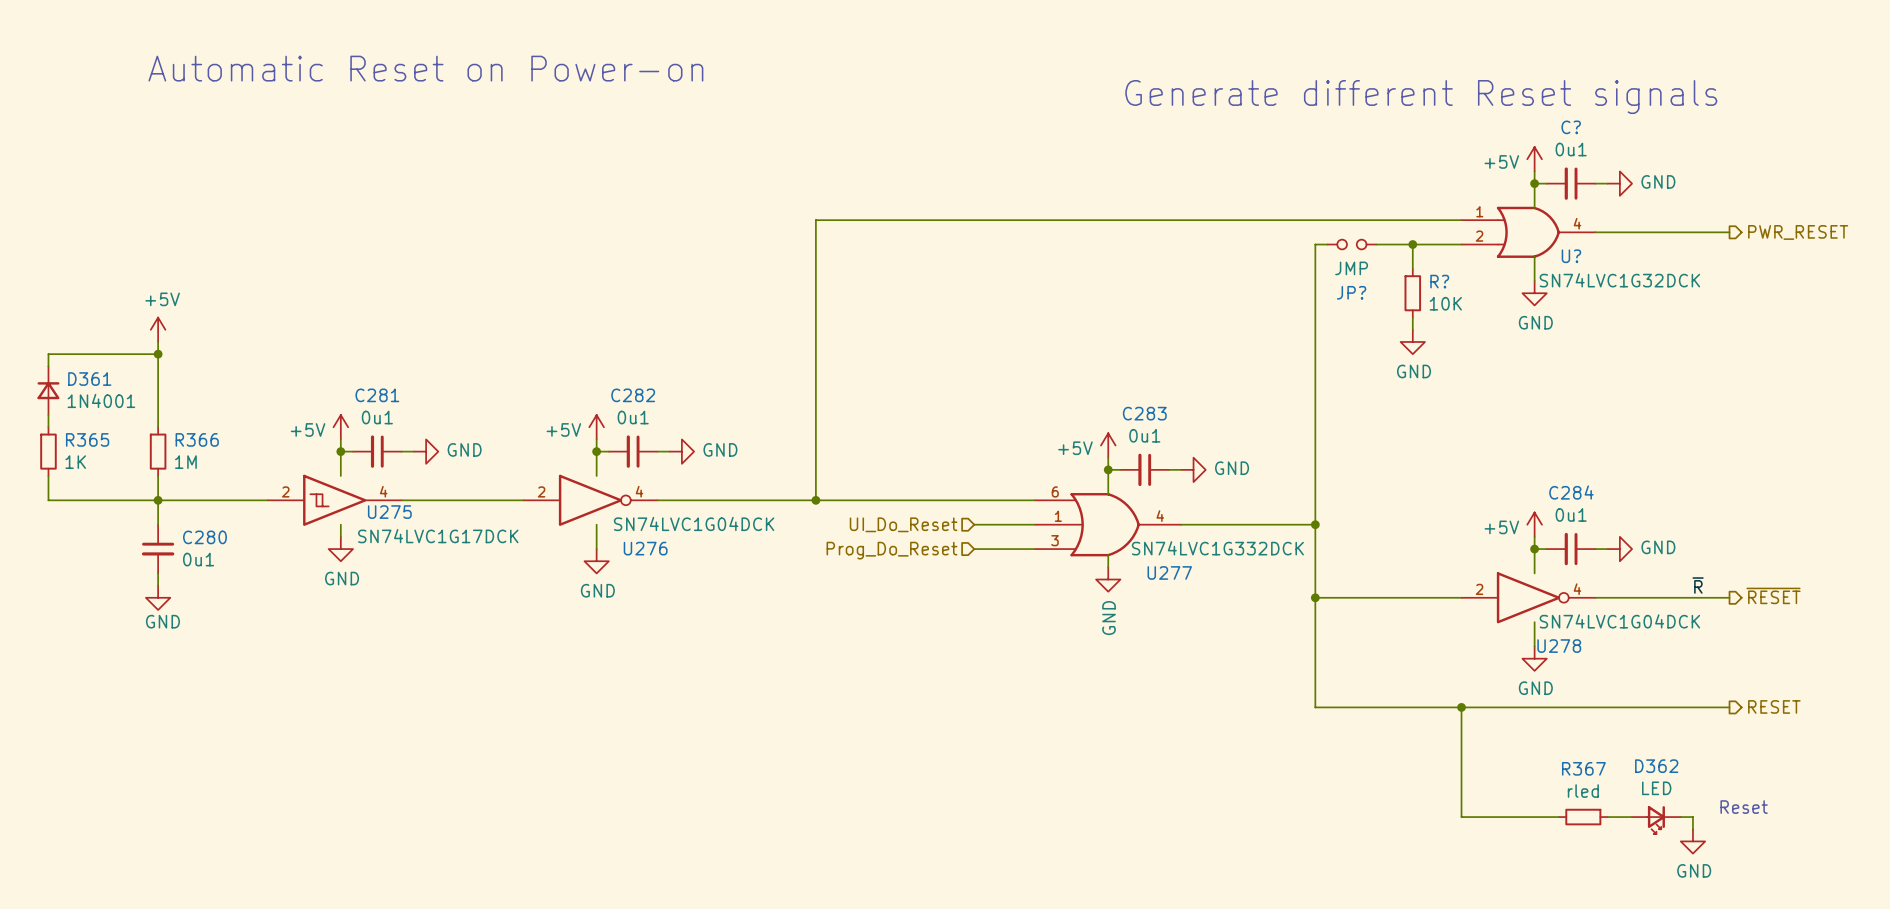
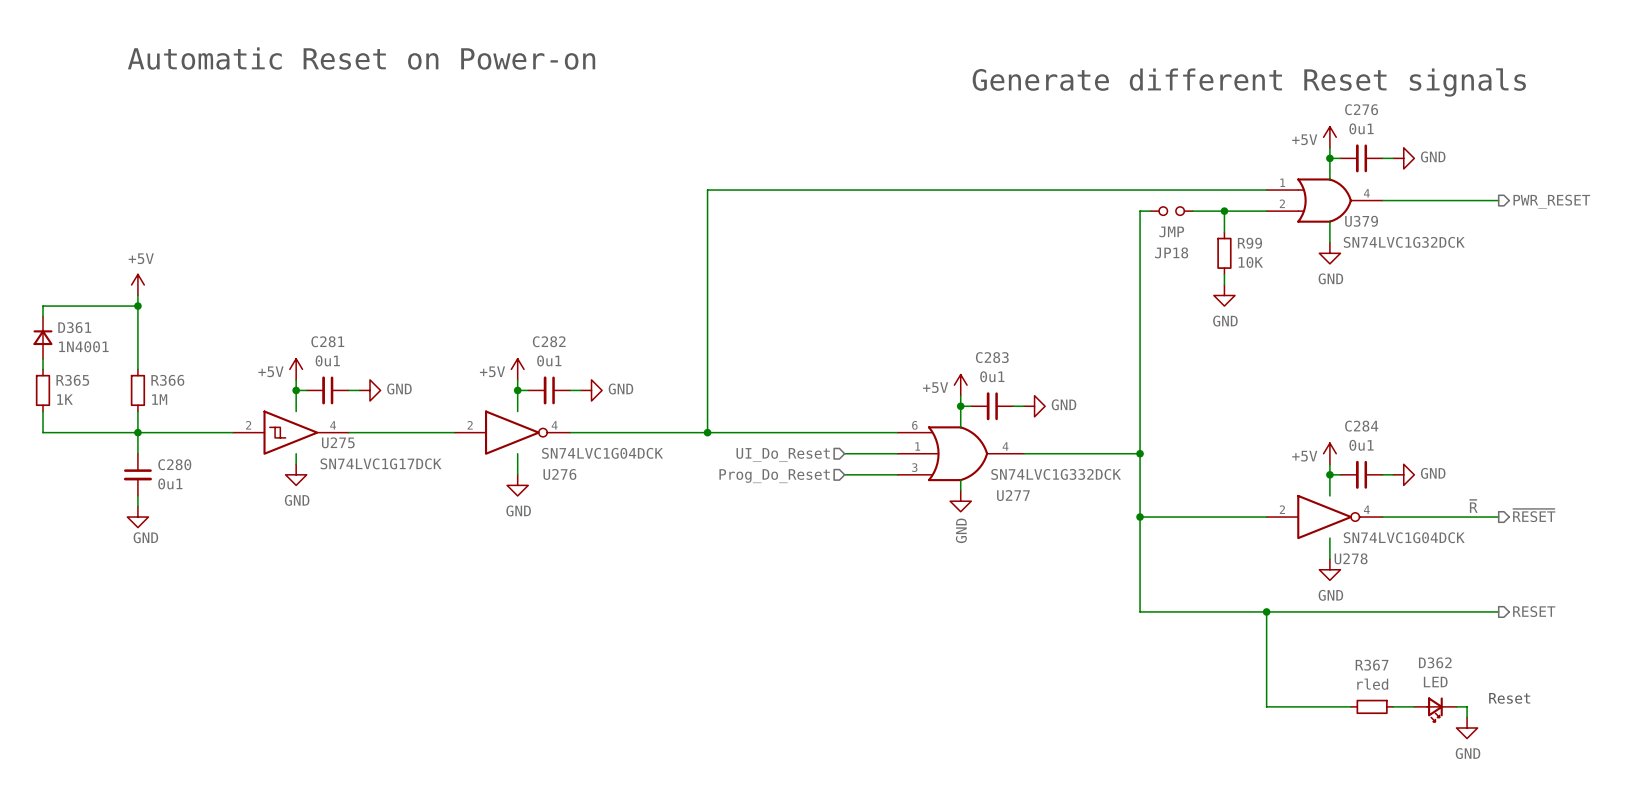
C? name: C? (1571, 127) -> C276 (1361, 109)
U? name: U? (1571, 256) -> U379 (1361, 221)
R? name: R? (1439, 281) -> R99 (1249, 243)
JP? name: JP? (1351, 292) -> JP18 (1171, 252)

